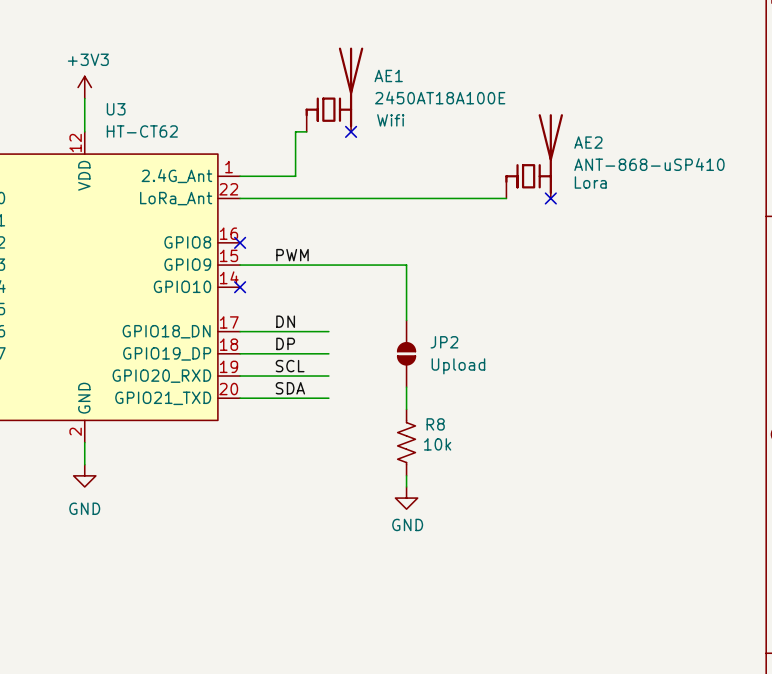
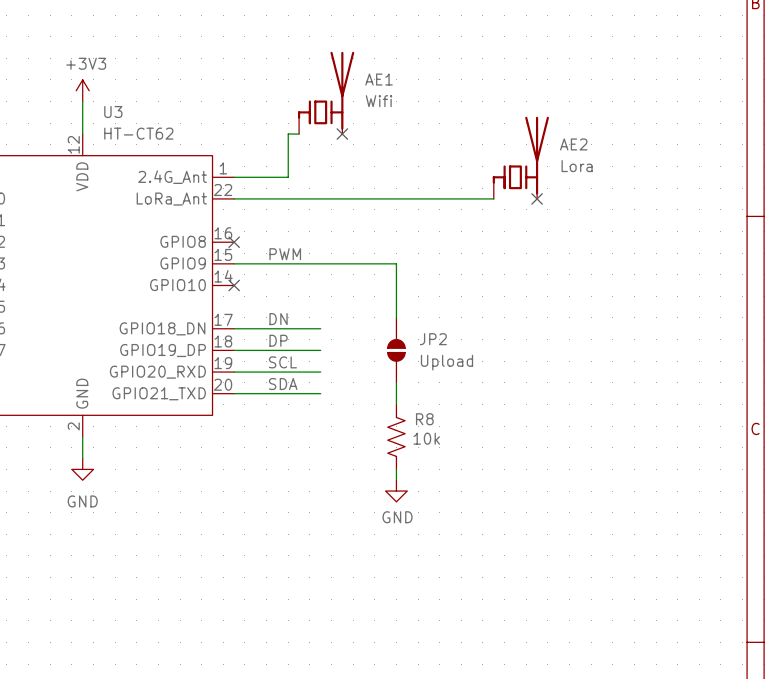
AE1 value: 2450AT18A100E (440, 97) -> Wifi (379, 101)
AE1 text: Wifi (390, 120) -> none
AE2 value: ANT-868-uSP410 (649, 164) -> Lora (577, 166)
AE2 text: Lora (590, 182) -> none

